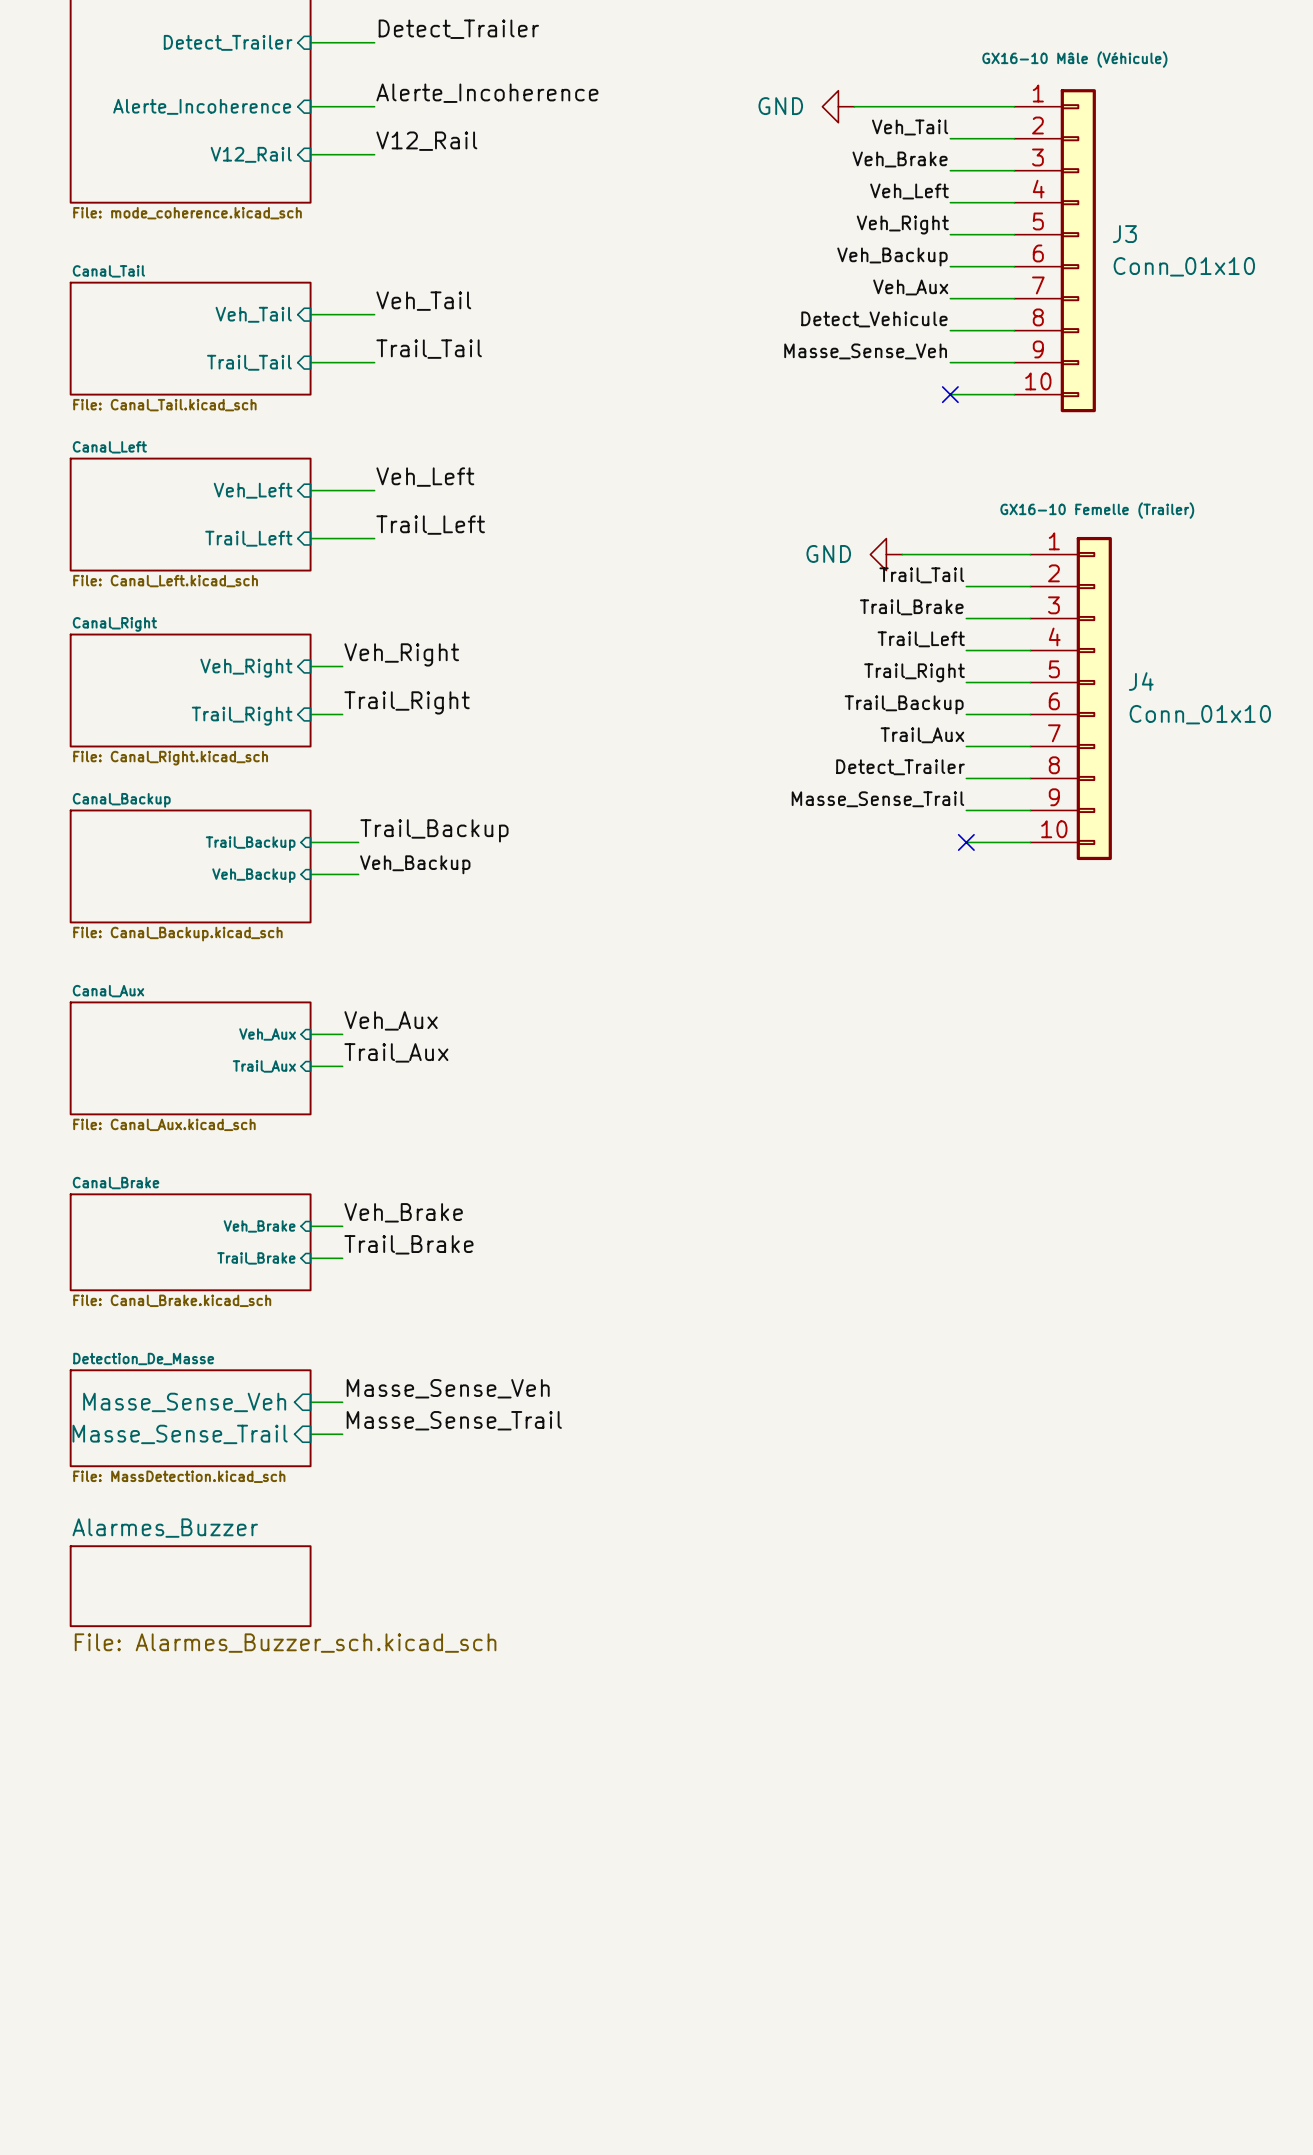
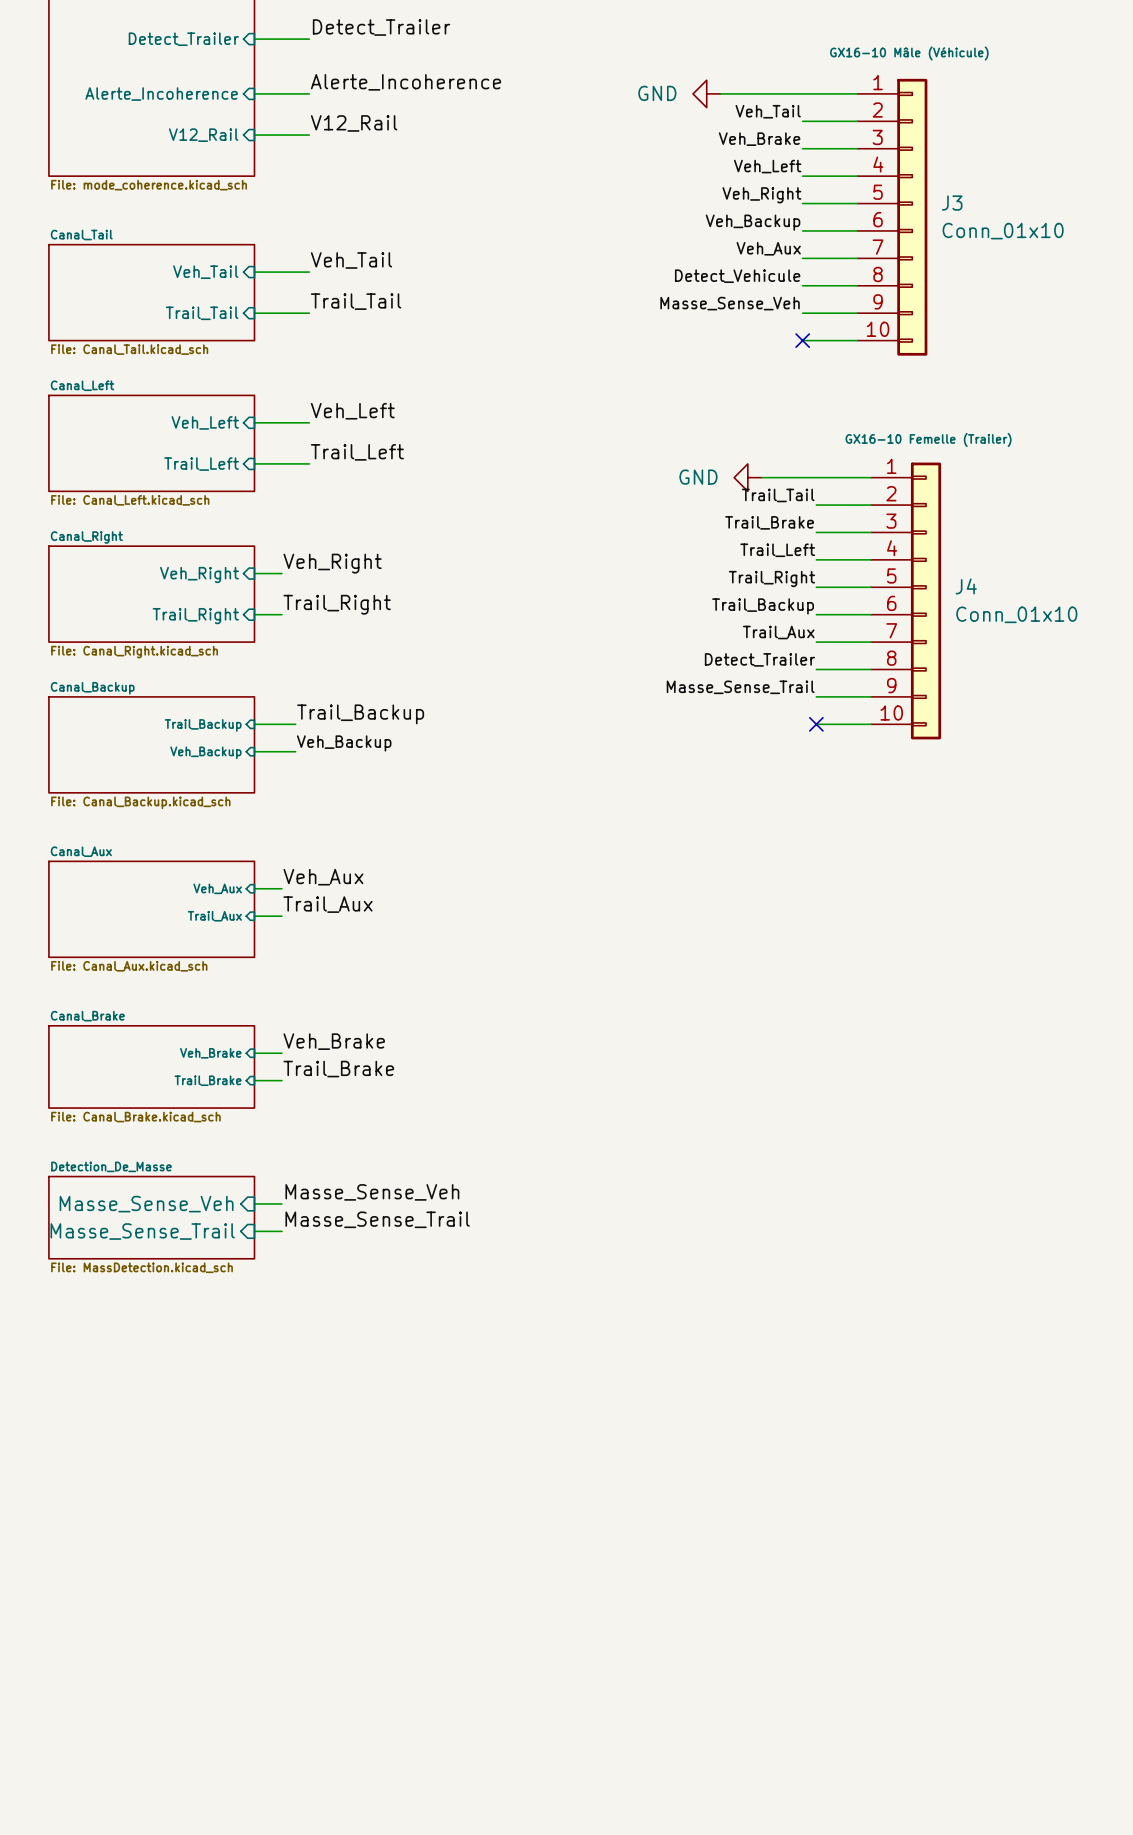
sheet Alarmes_Buzzer: File: Alarmes_Buzzer_sch.kicad_sch (190, 1586) -> none

